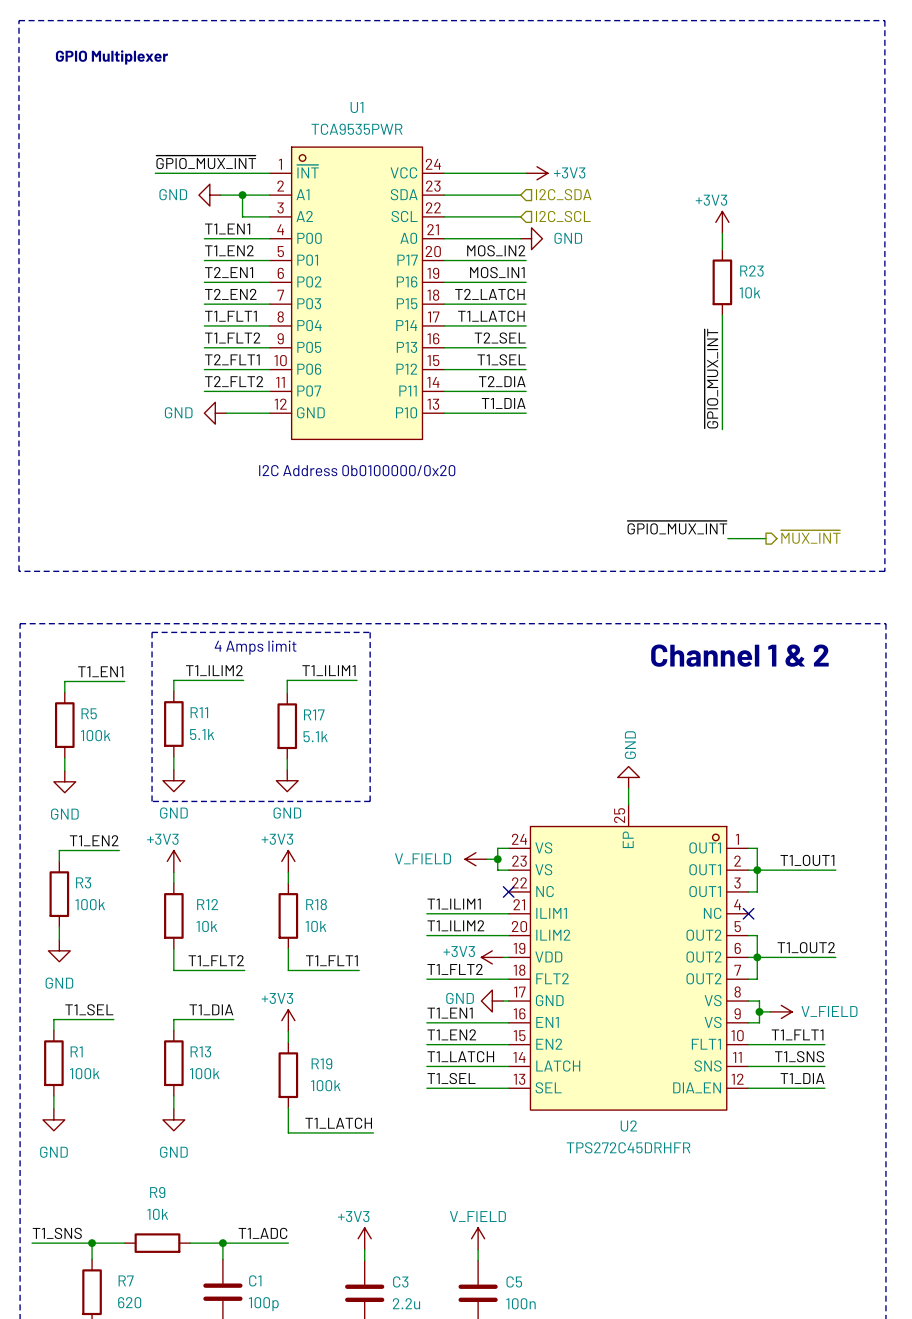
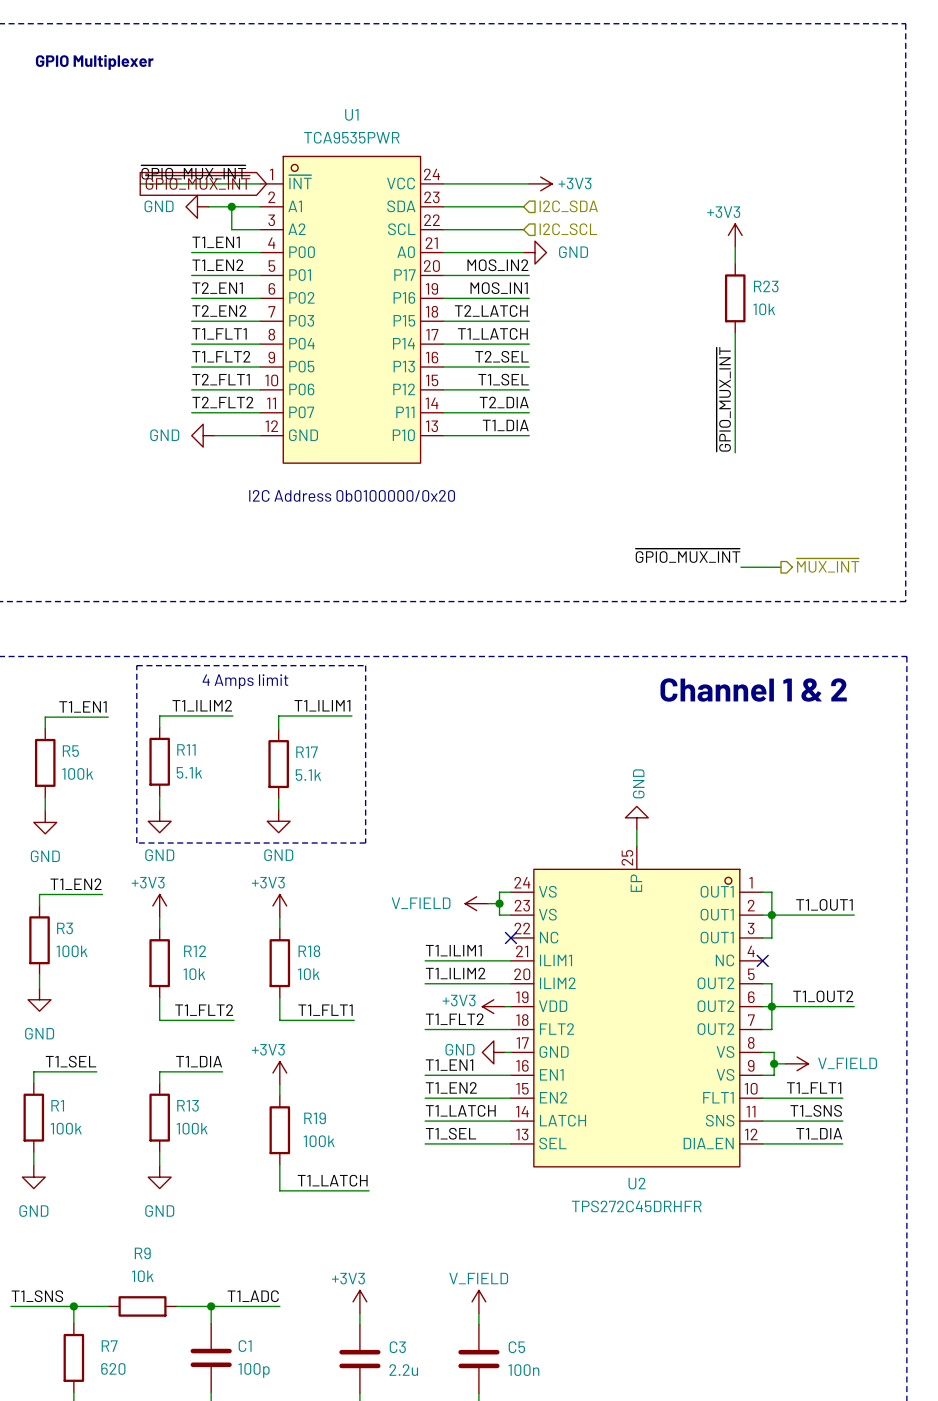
global label: none -> ~{GPIO_MUX_INT} (197, 182)

